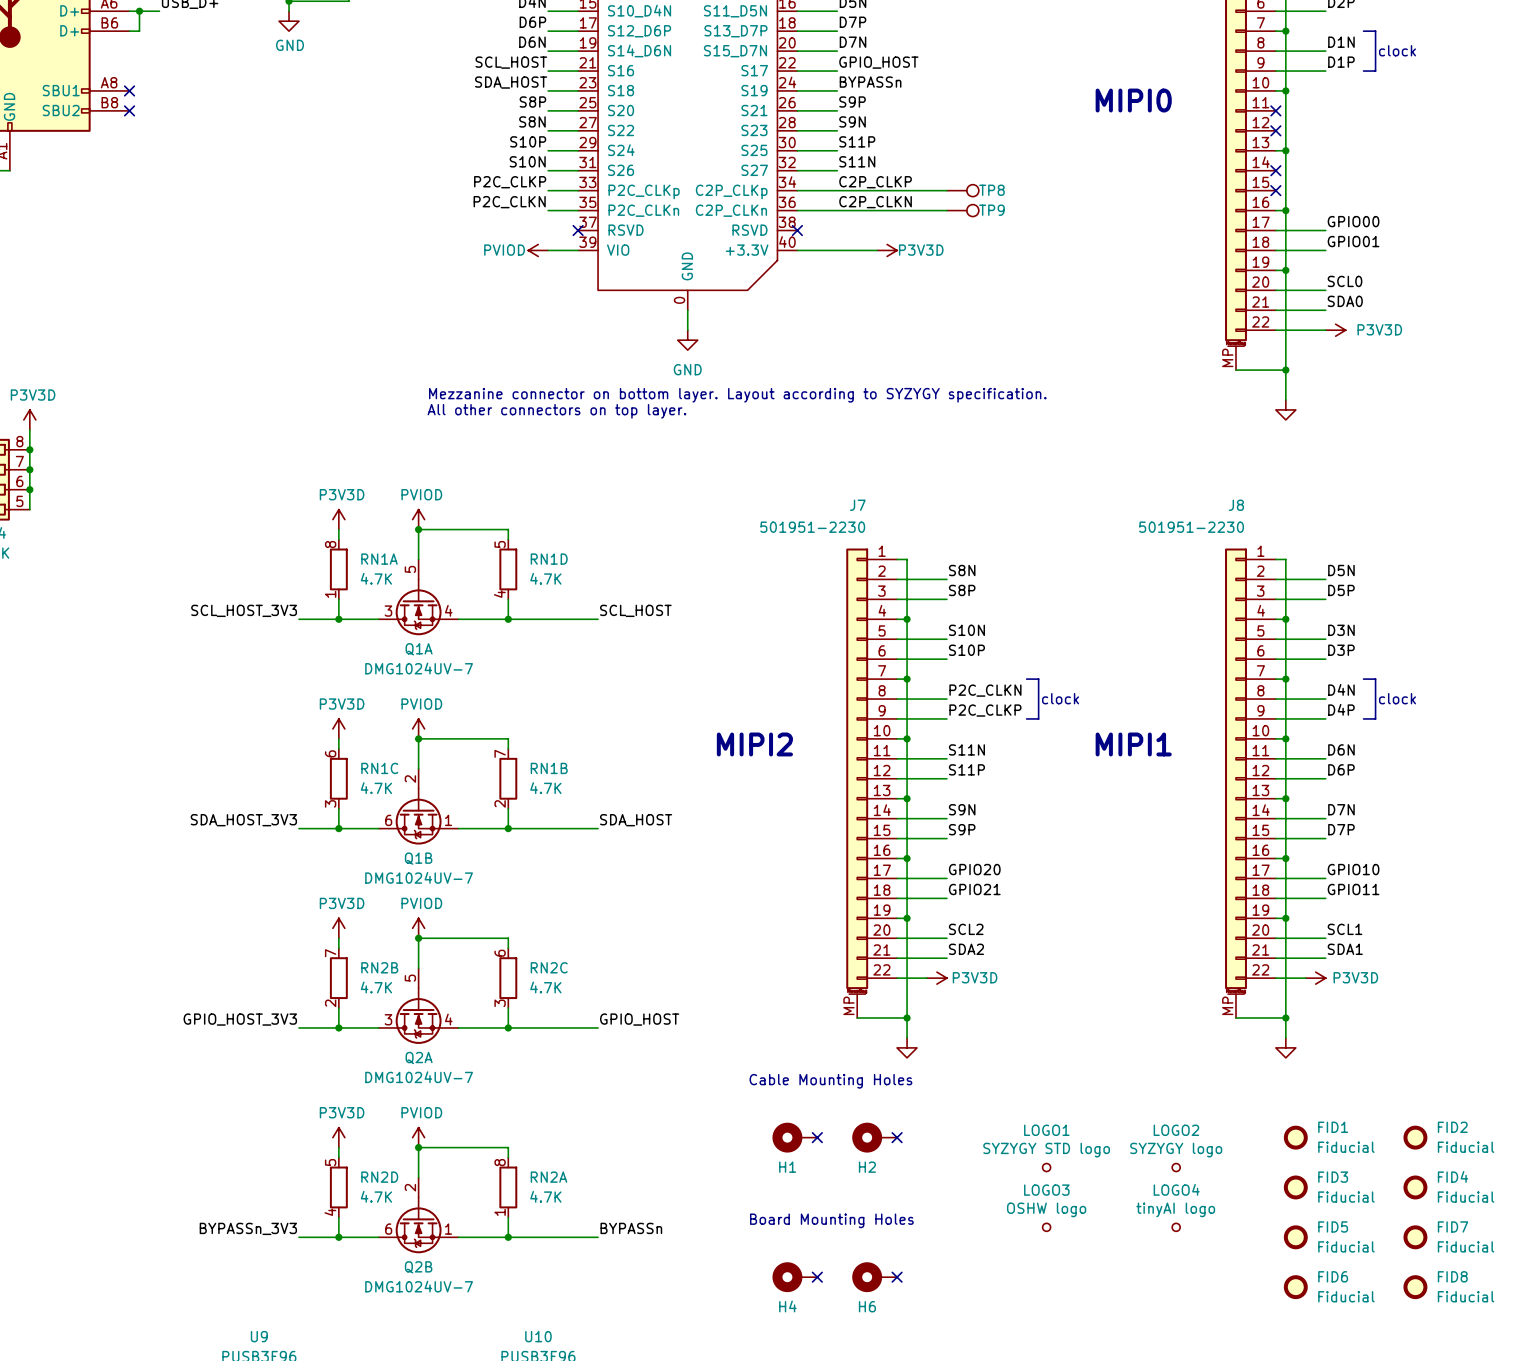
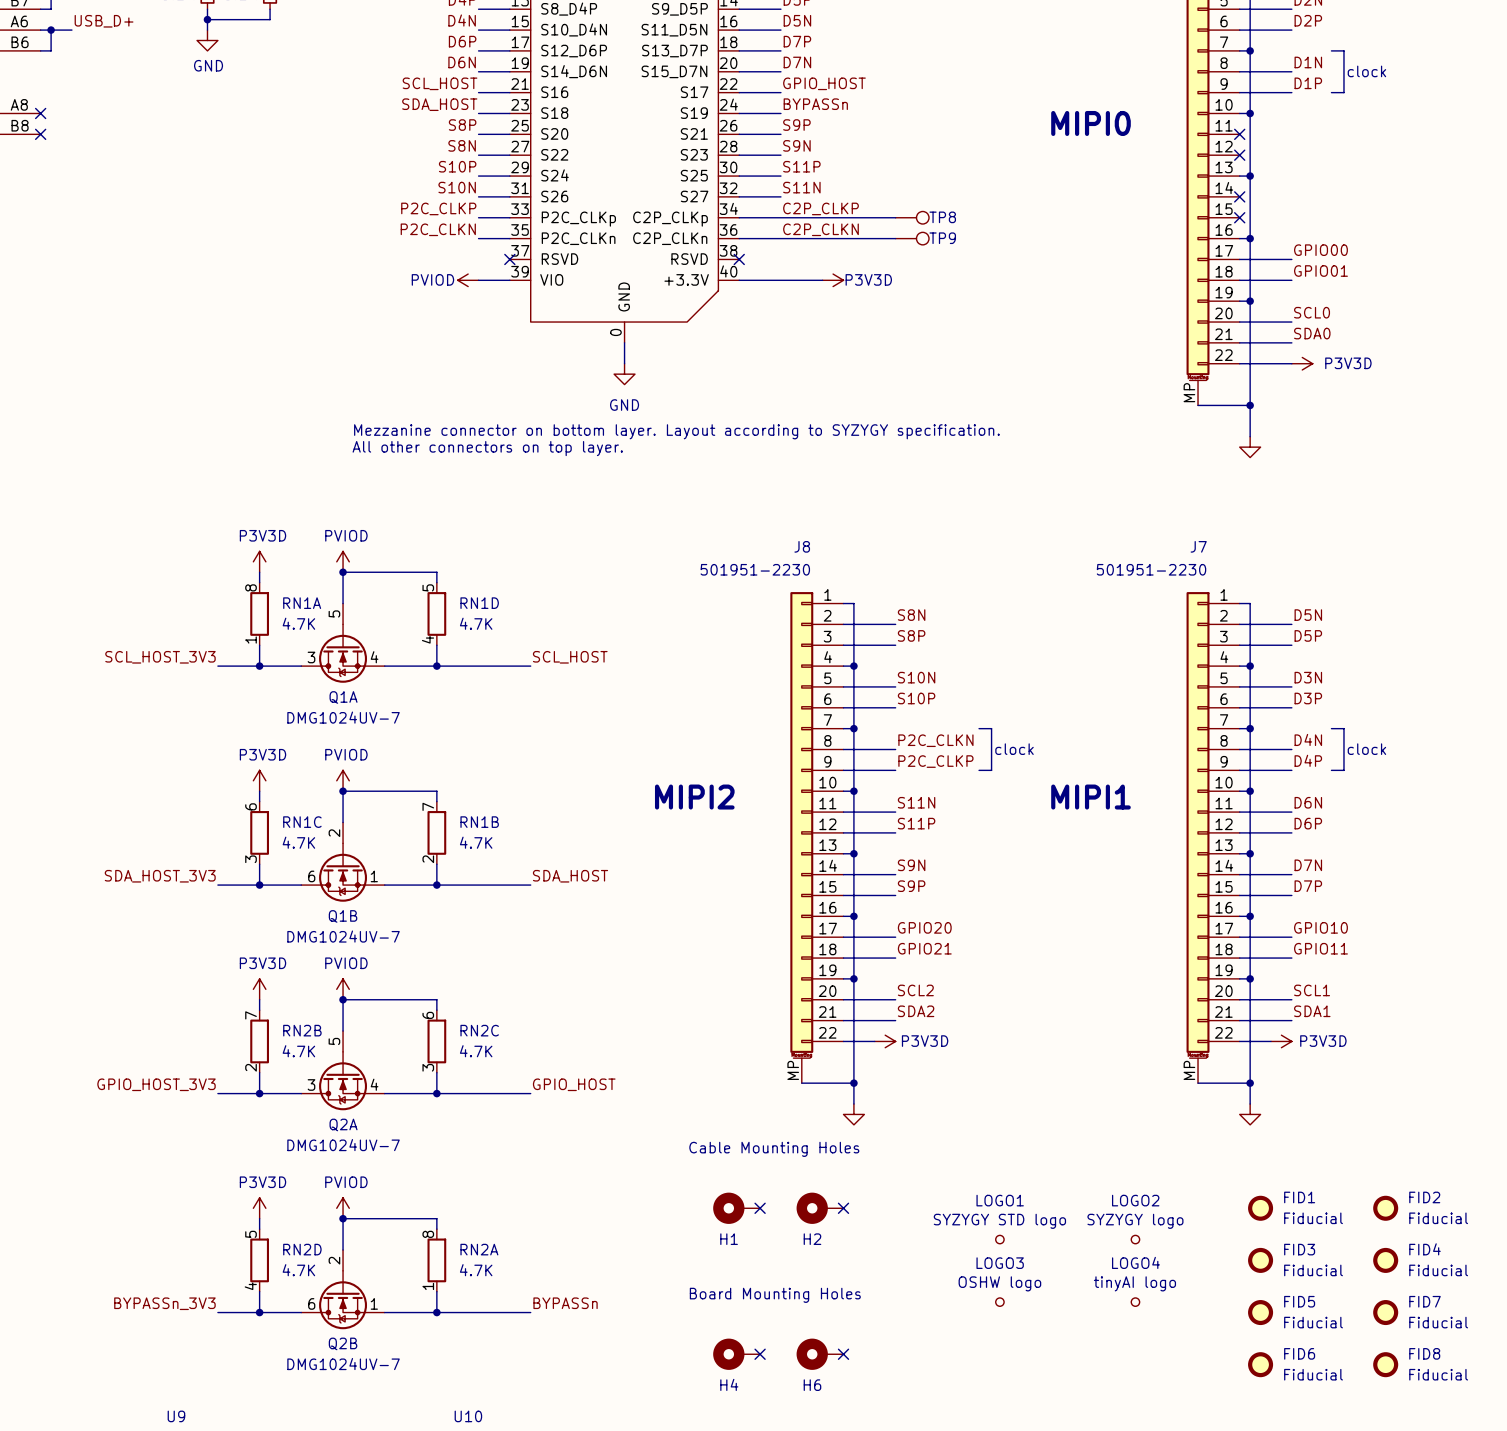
J7 name: J7 (857, 505) -> J8 (802, 546)
J8 name: J8 (1236, 505) -> J7 (1198, 546)

